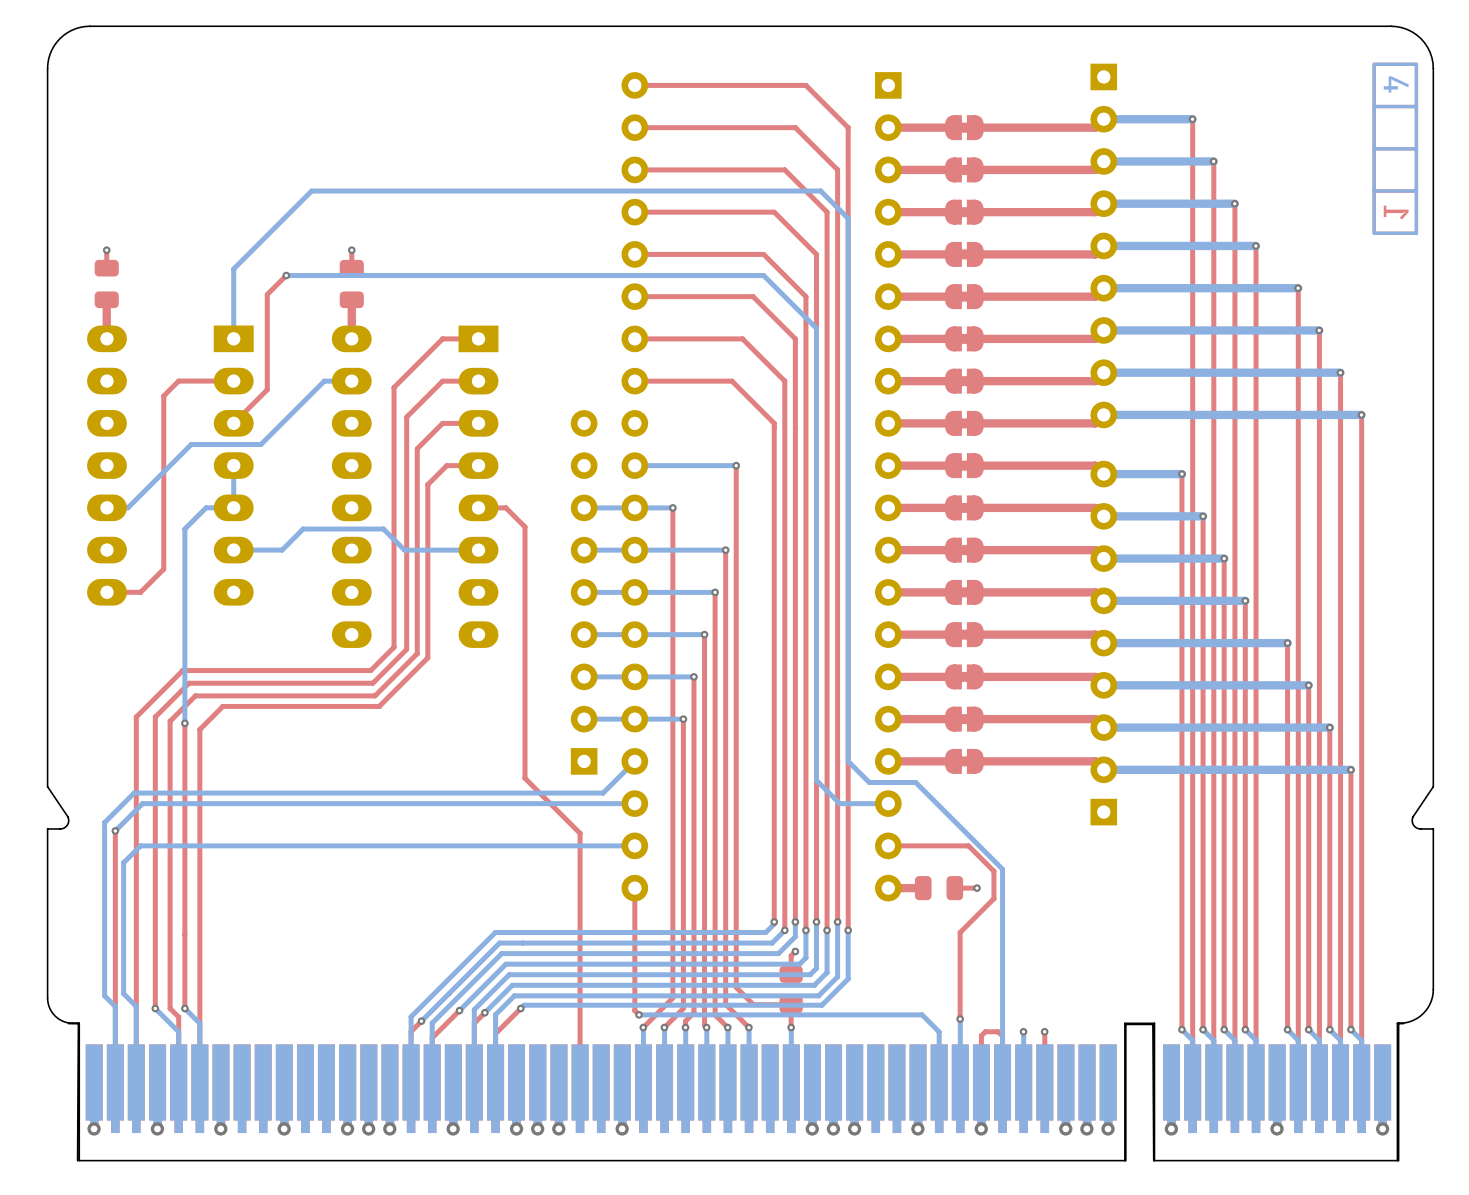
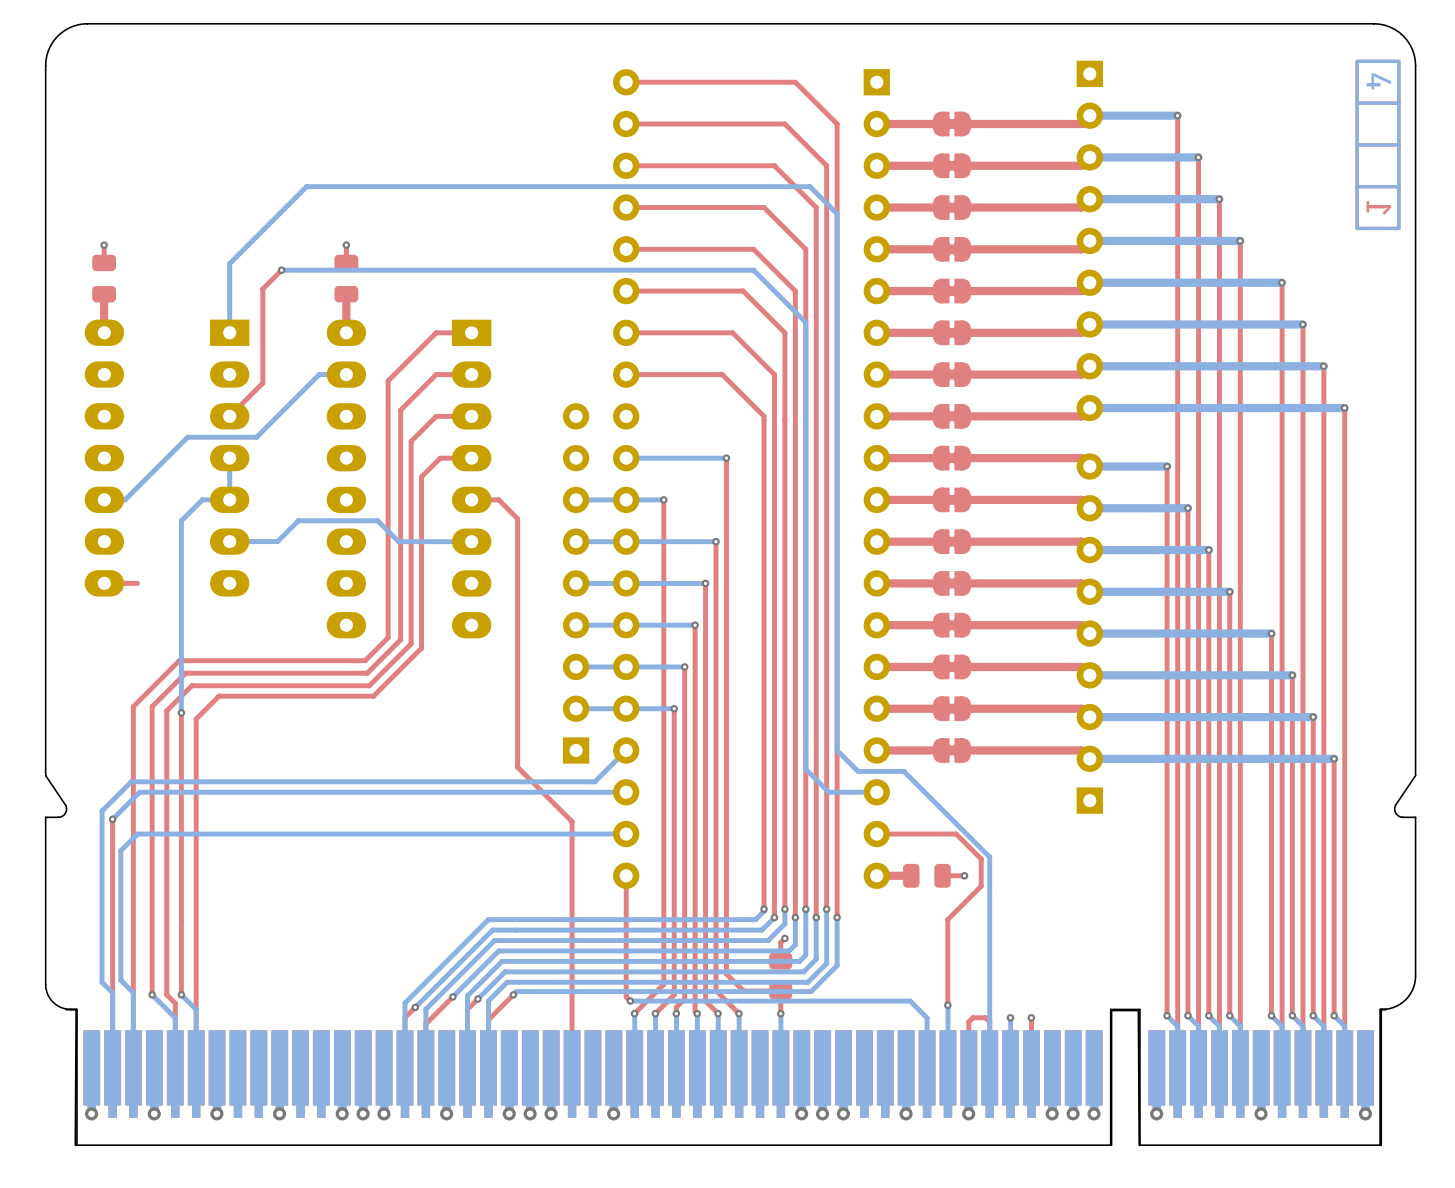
top track: (233, 381) (178, 381) (163, 395) (163, 569) (140, 592) -> none

